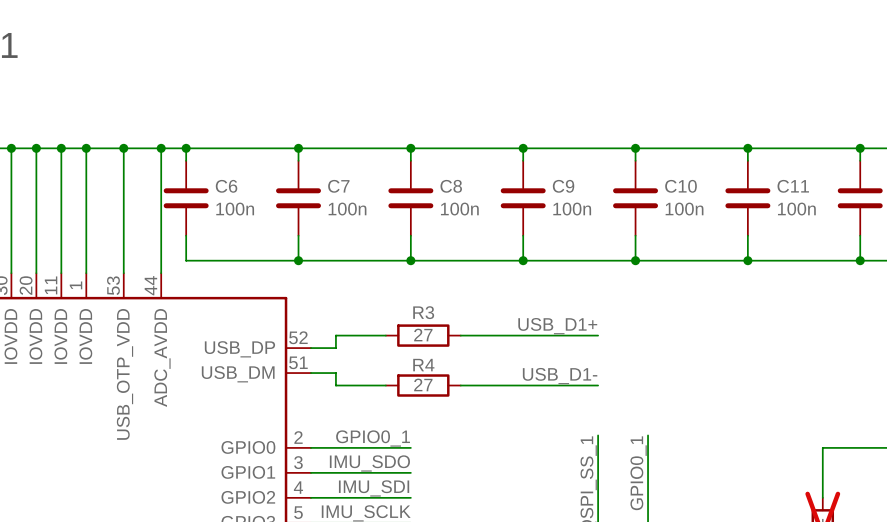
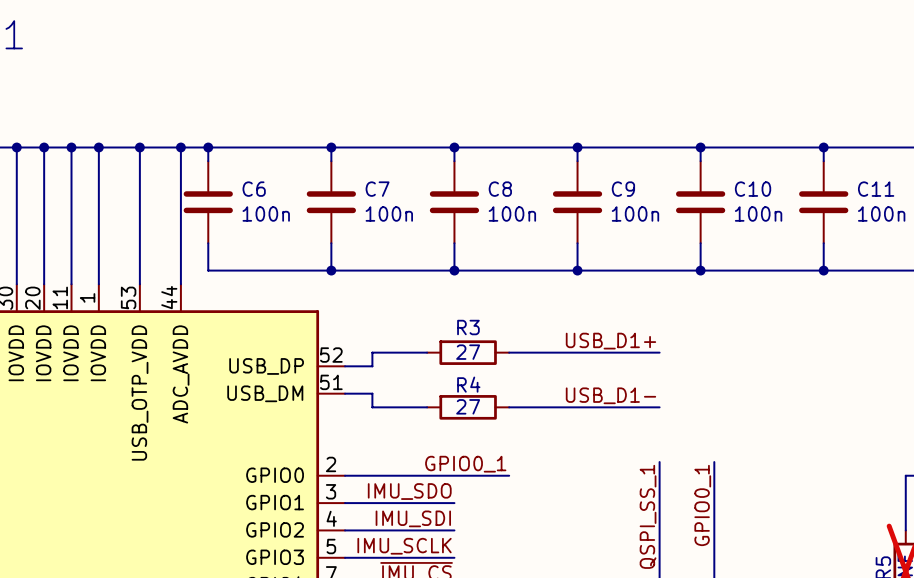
label position: GPIO0_1 (373, 438) -> GPIO0_1 (465, 464)
wire: none -> (454, 475) (509, 475)

